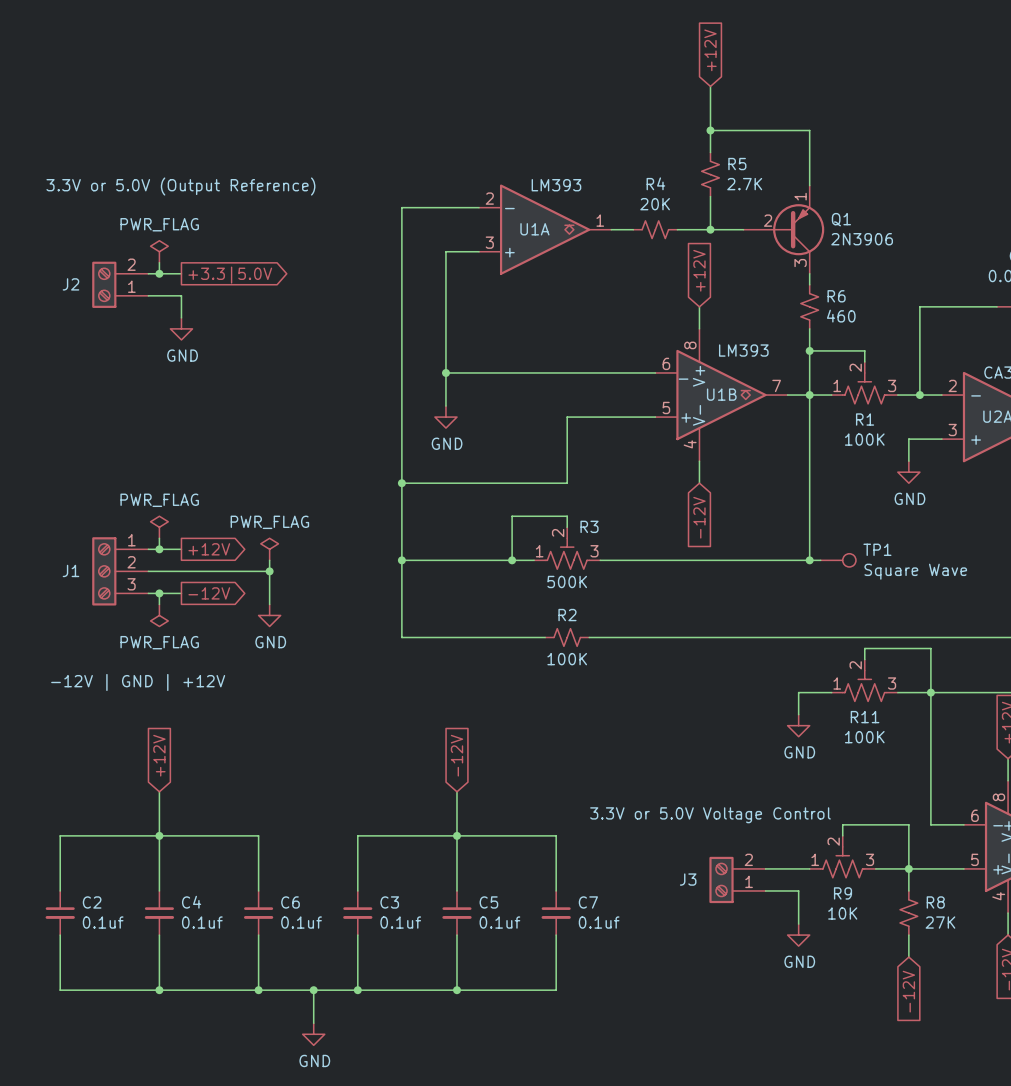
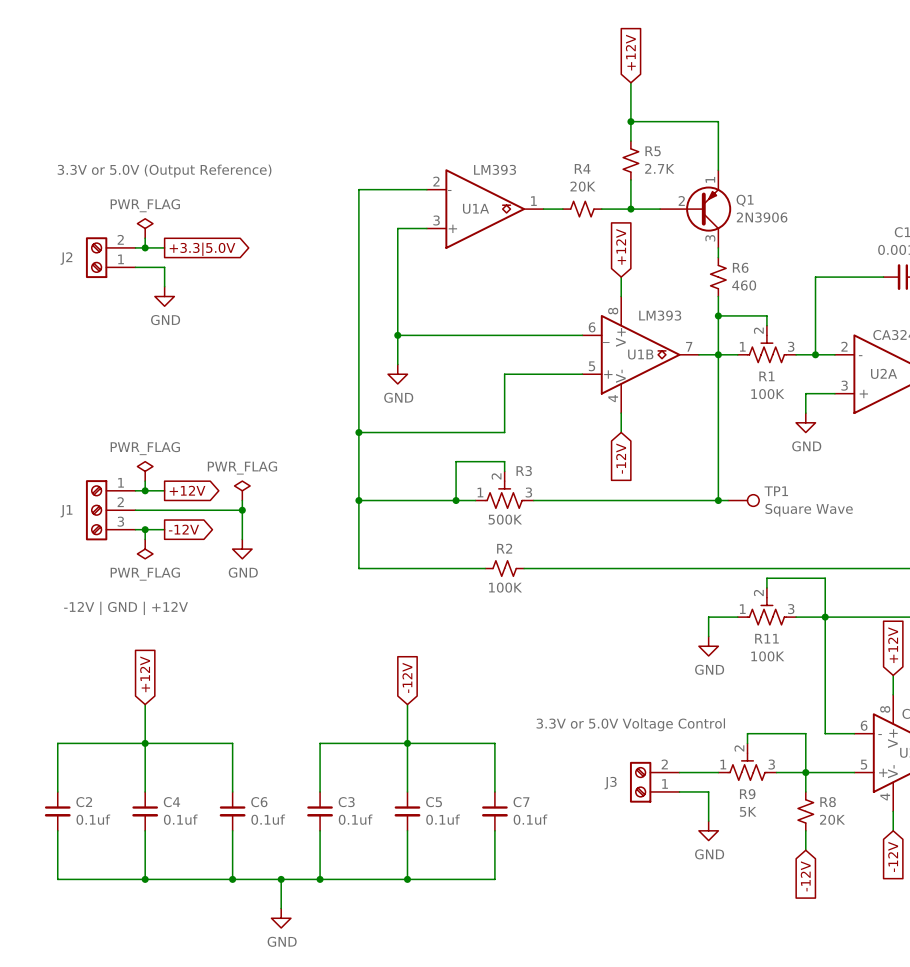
R9 value: 10K (842, 913) -> 5K (748, 811)
R8 value: 27K (940, 922) -> 20K (832, 819)

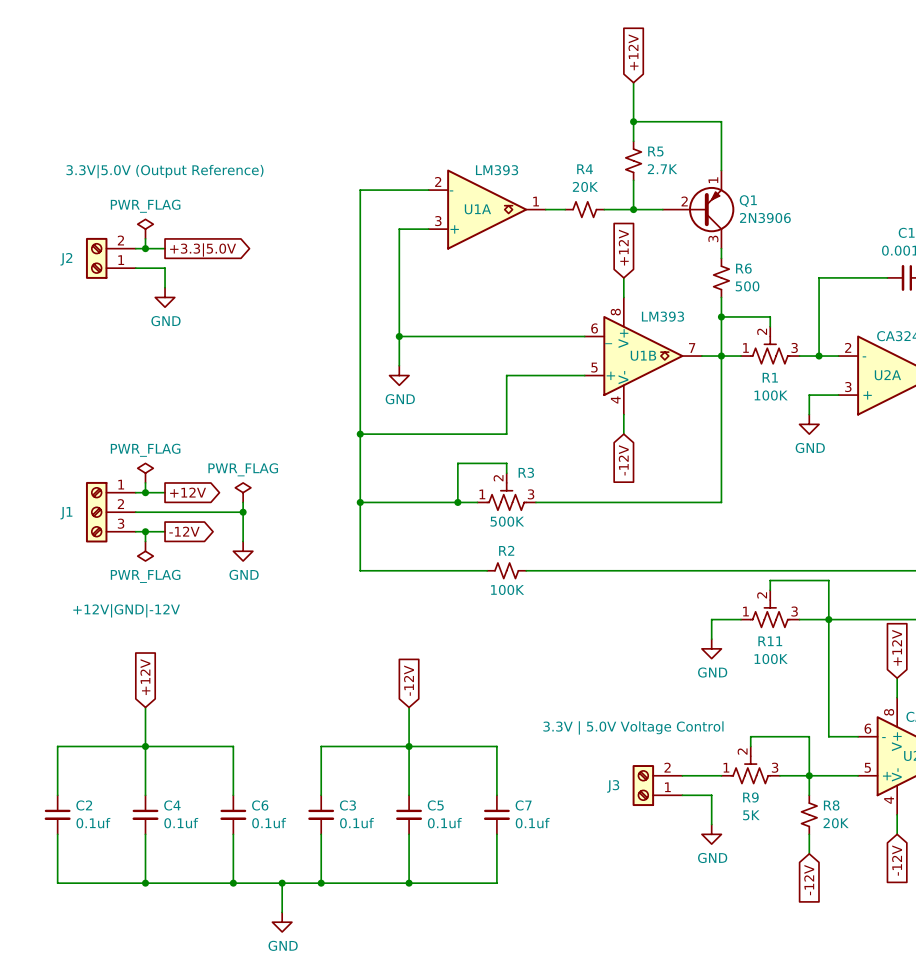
J2 value: 3.3V or 5.0V (Output Reference) (164, 171) -> 3.3V|5.0V (Output Reference) (164, 171)
R6 value: 460 (744, 285) -> 500 (747, 286)
wire: (718, 500) (728, 500) -> none
junction: (718, 500) -> none
TP1: Square Wave (743, 500) -> none
J1 value: -12V | GND | +12V (126, 608) -> +12V|GND|-12V (126, 610)
J3 value: 3.3V or 5.0V Voltage Control (630, 724) -> 3.3V | 5.0V Voltage Control (633, 727)

